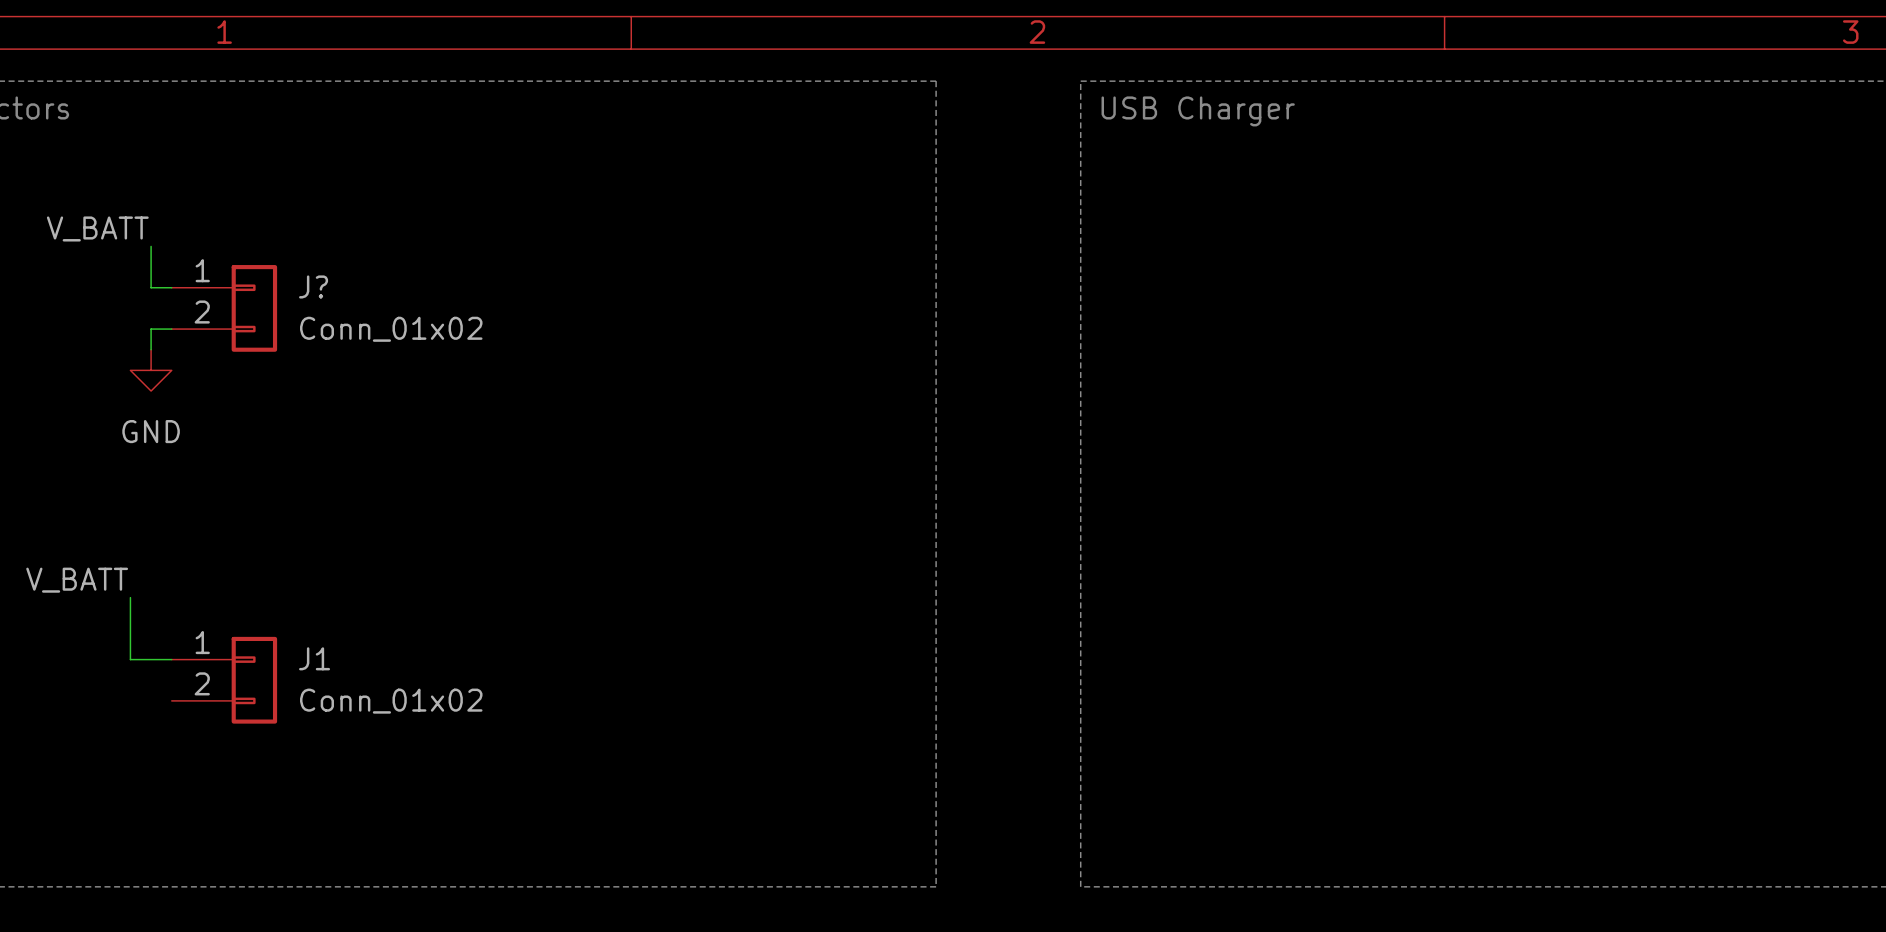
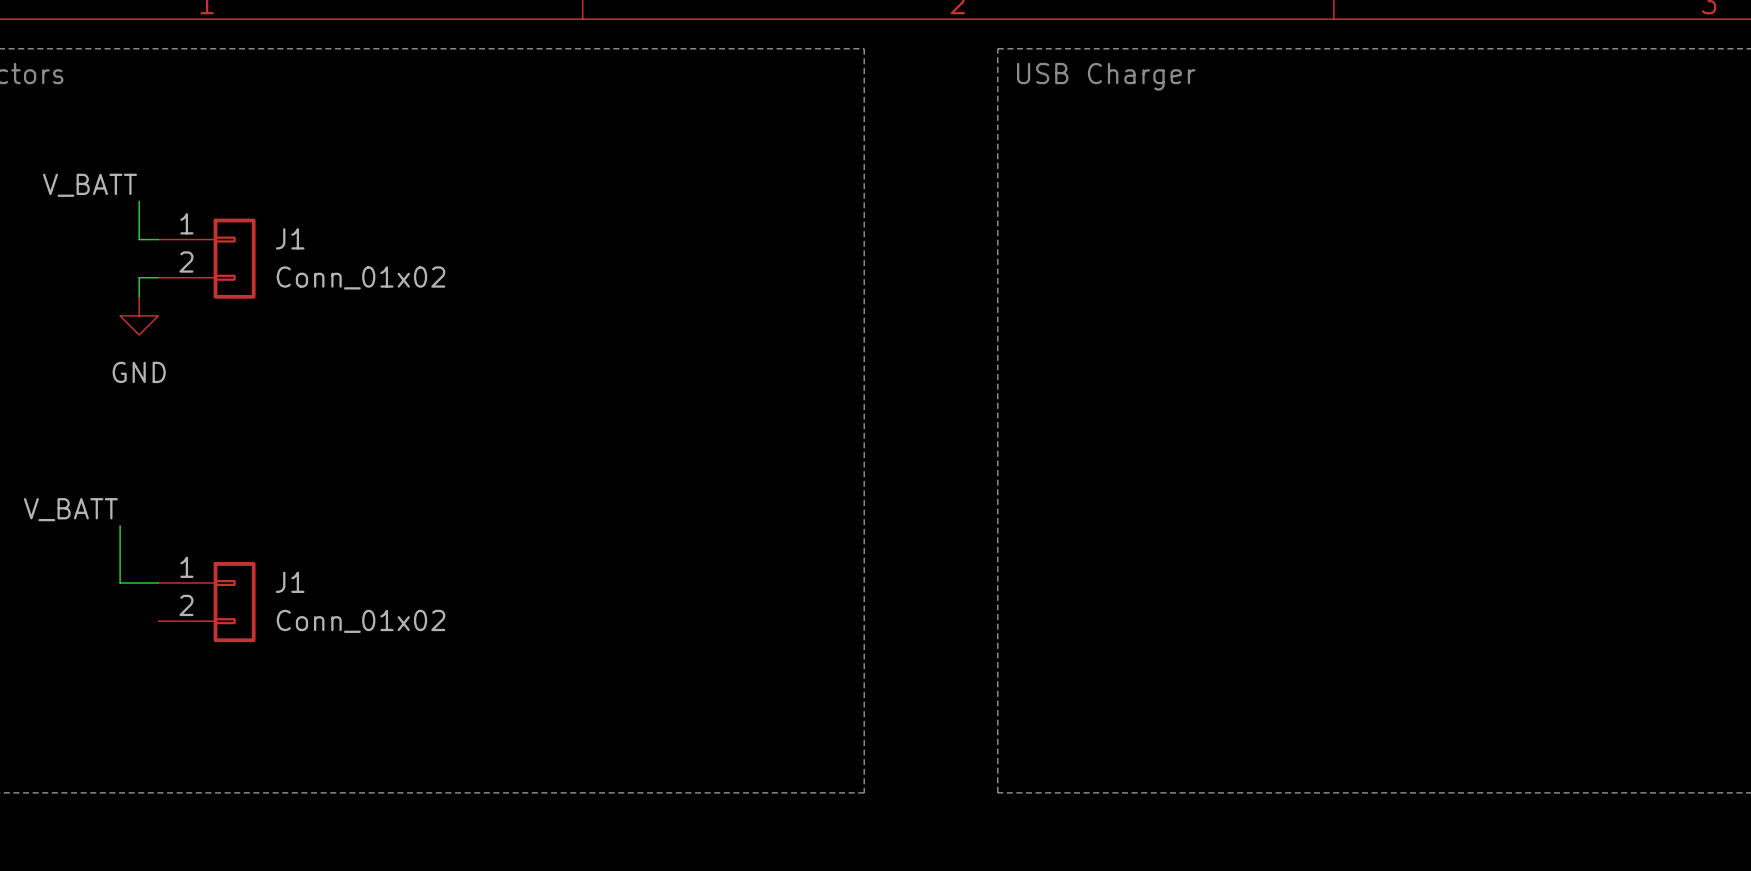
J? name: J? (313, 286) -> J1 (290, 238)

